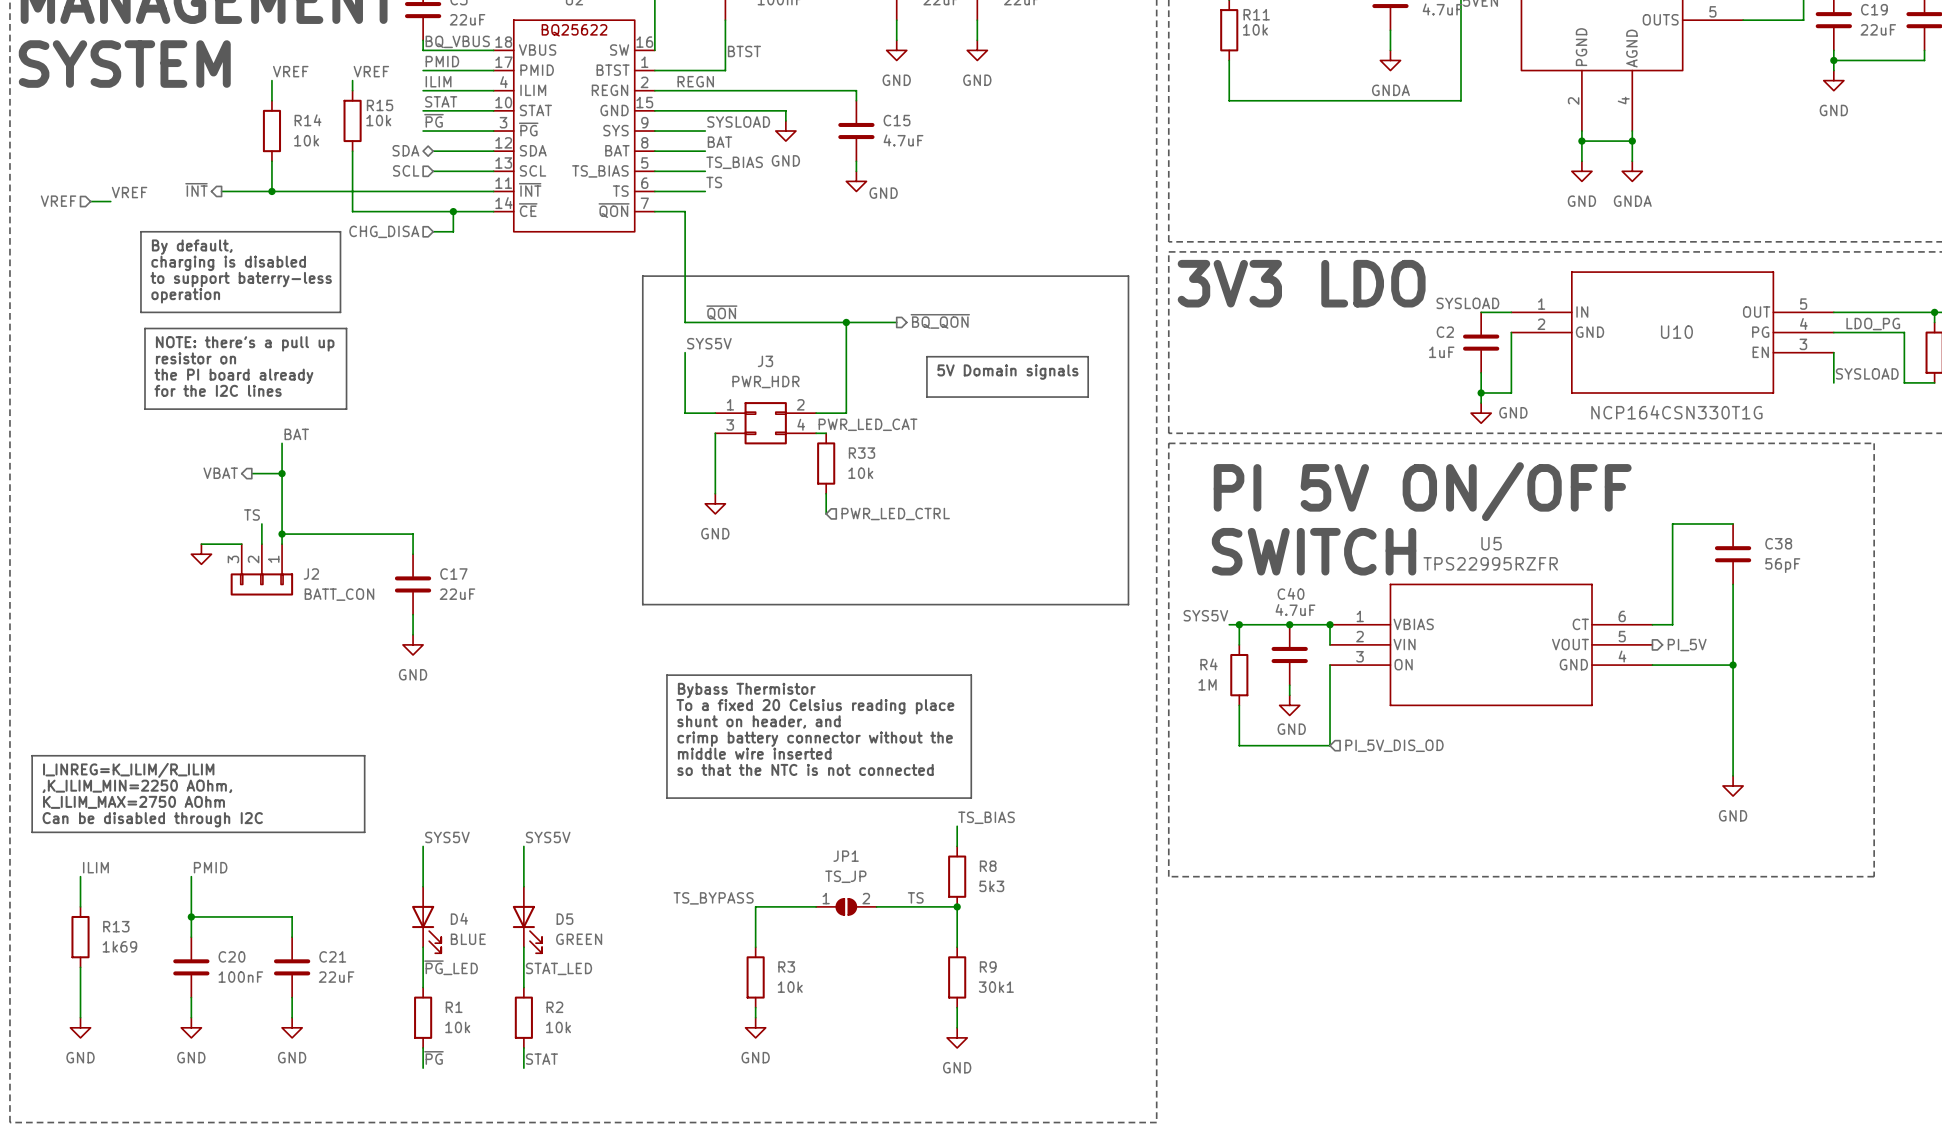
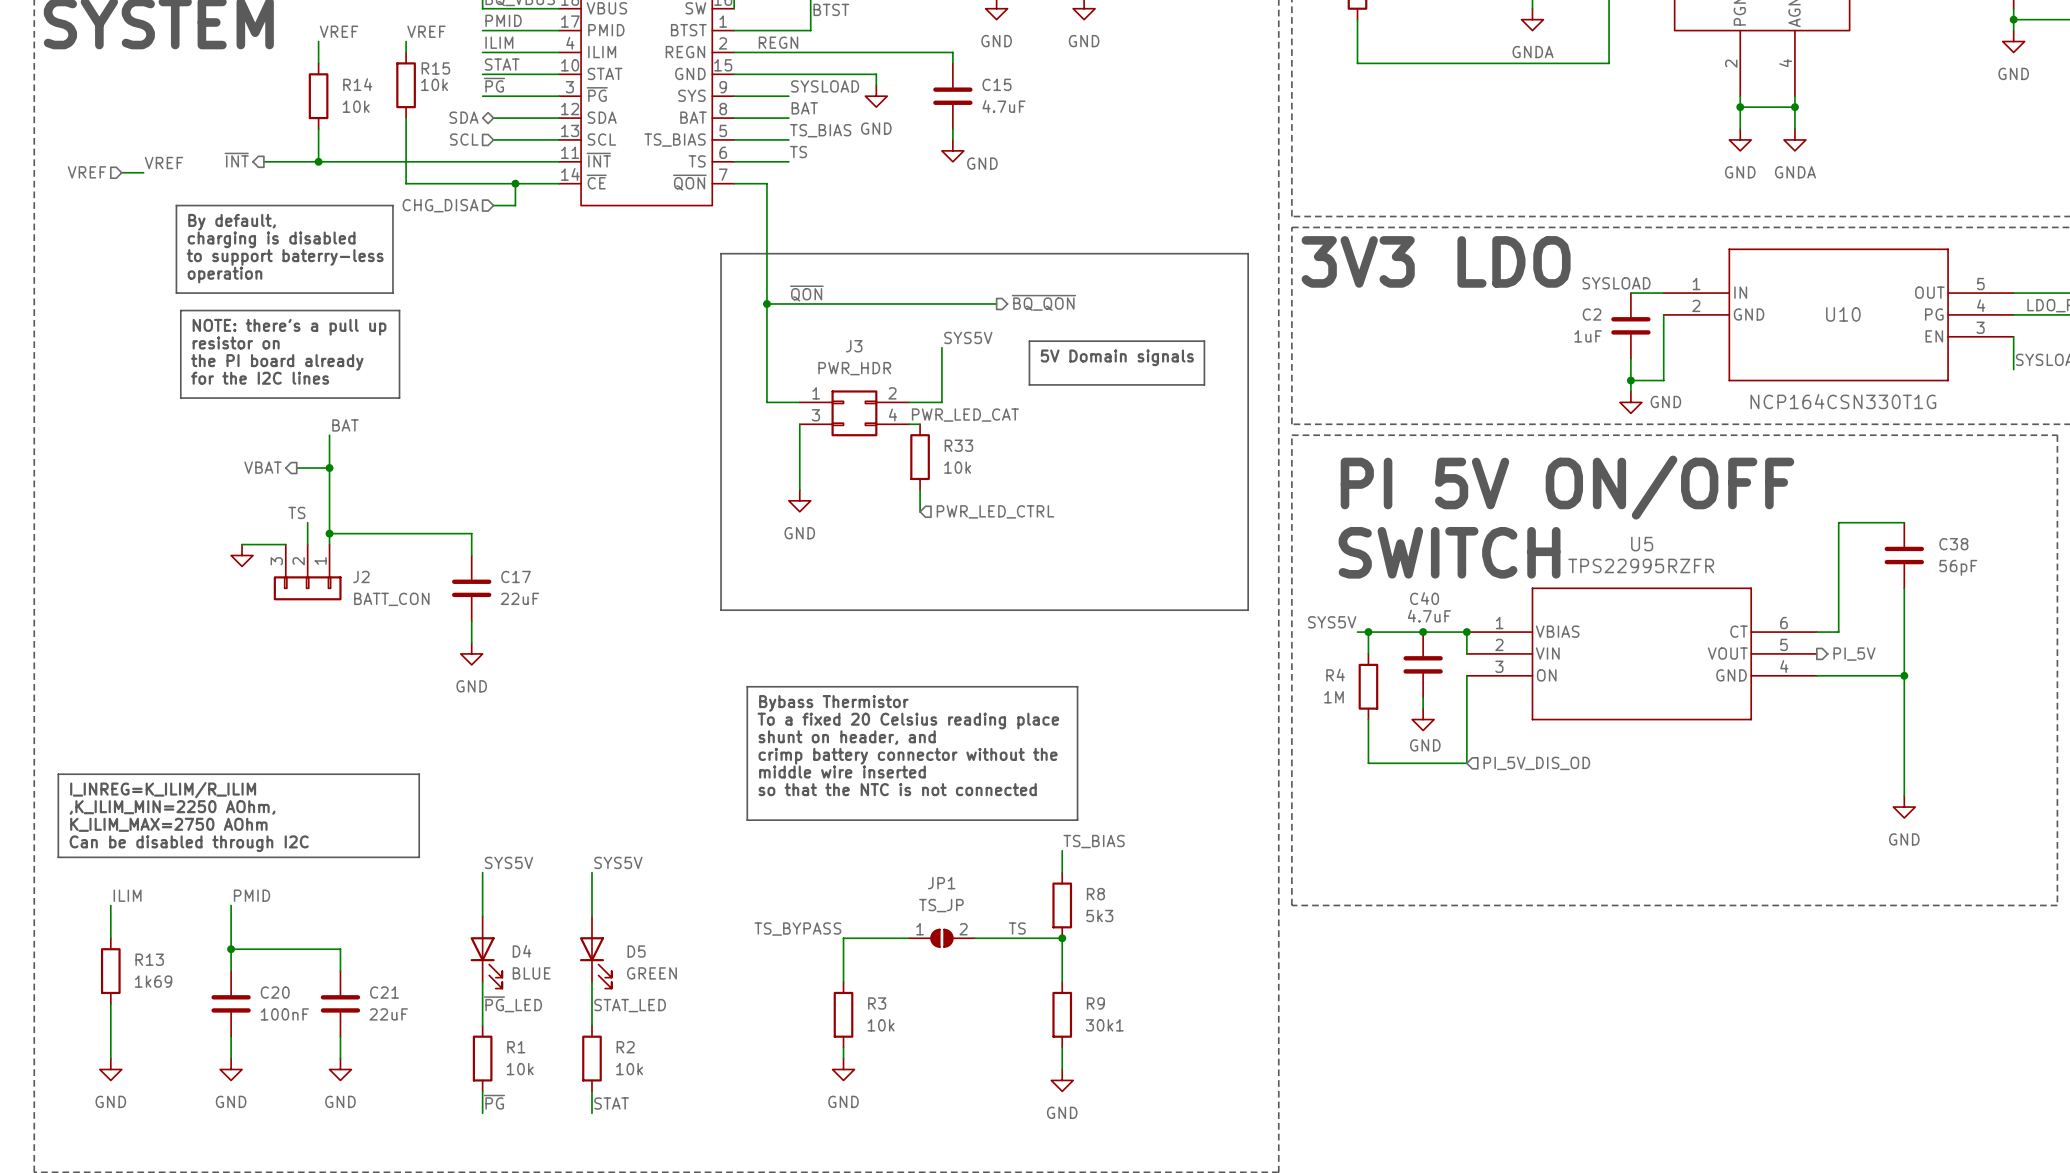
wire: none -> (766, 303) (766, 336)
junction: none -> (766, 303)
wire: (846, 322) (846, 362) -> none
junction: (846, 322) -> none
label position: SYS5V (709, 343) -> SYS5V (968, 337)

